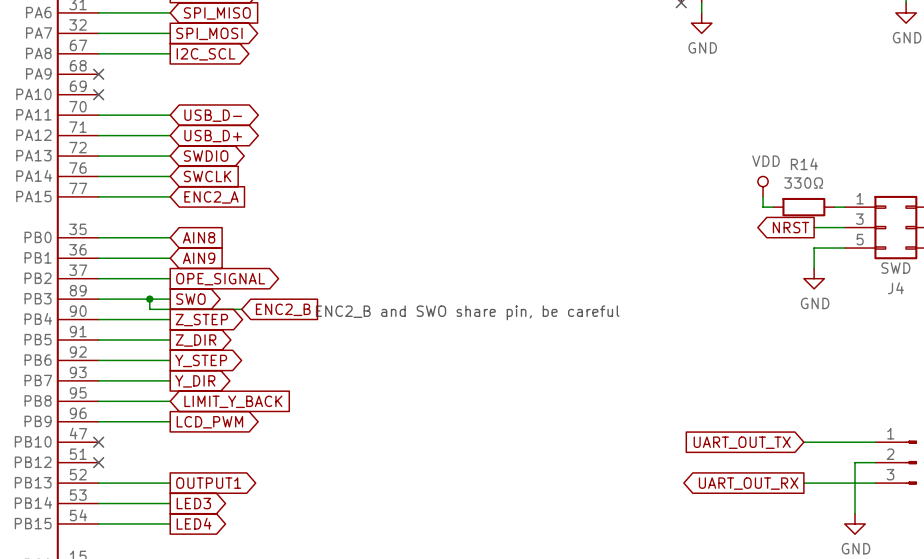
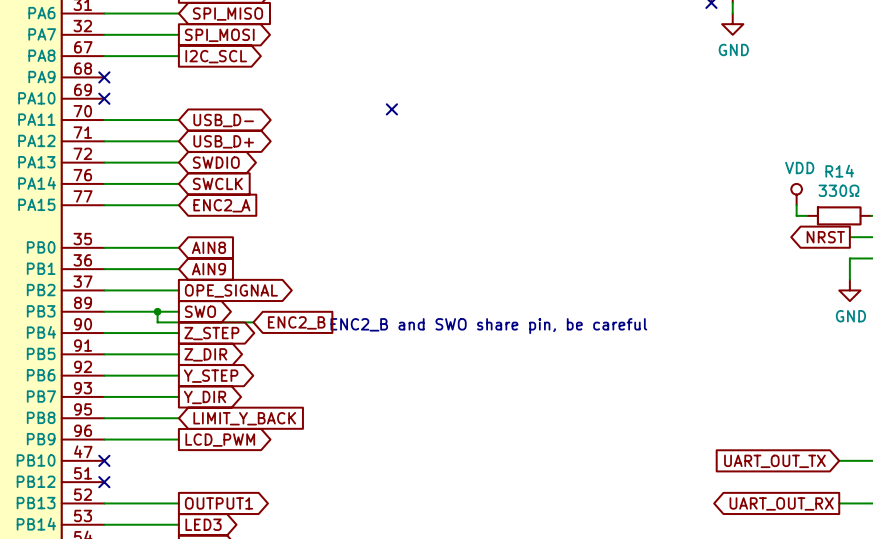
no-connect mark: none -> (391, 109)

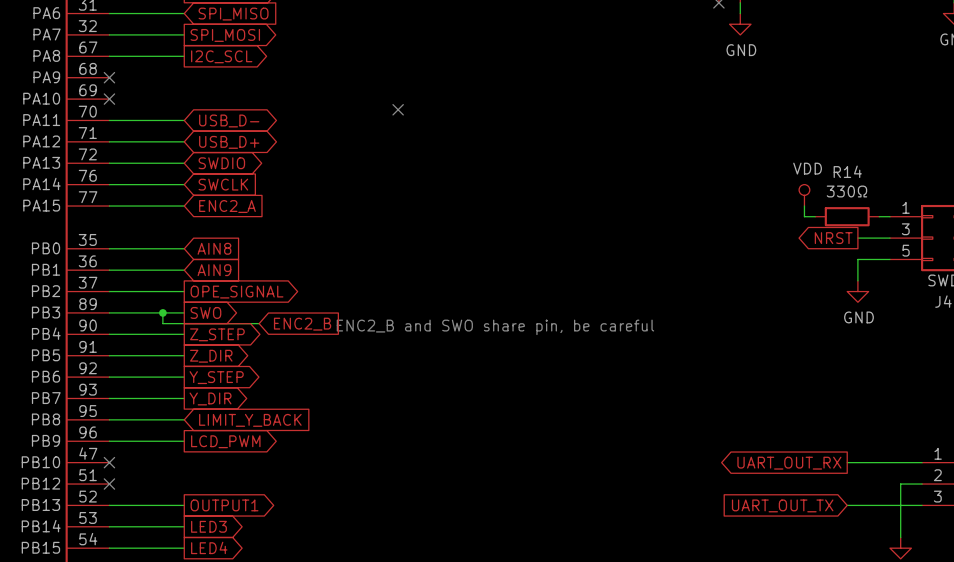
global label shape: input (774, 461) -> output (789, 463)
global label: UART_OUT_TX (774, 461) -> UART_OUT_RX (789, 463)
global label shape: output (781, 503) -> input (782, 505)
global label: UART_OUT_RX (781, 503) -> UART_OUT_TX (782, 505)

